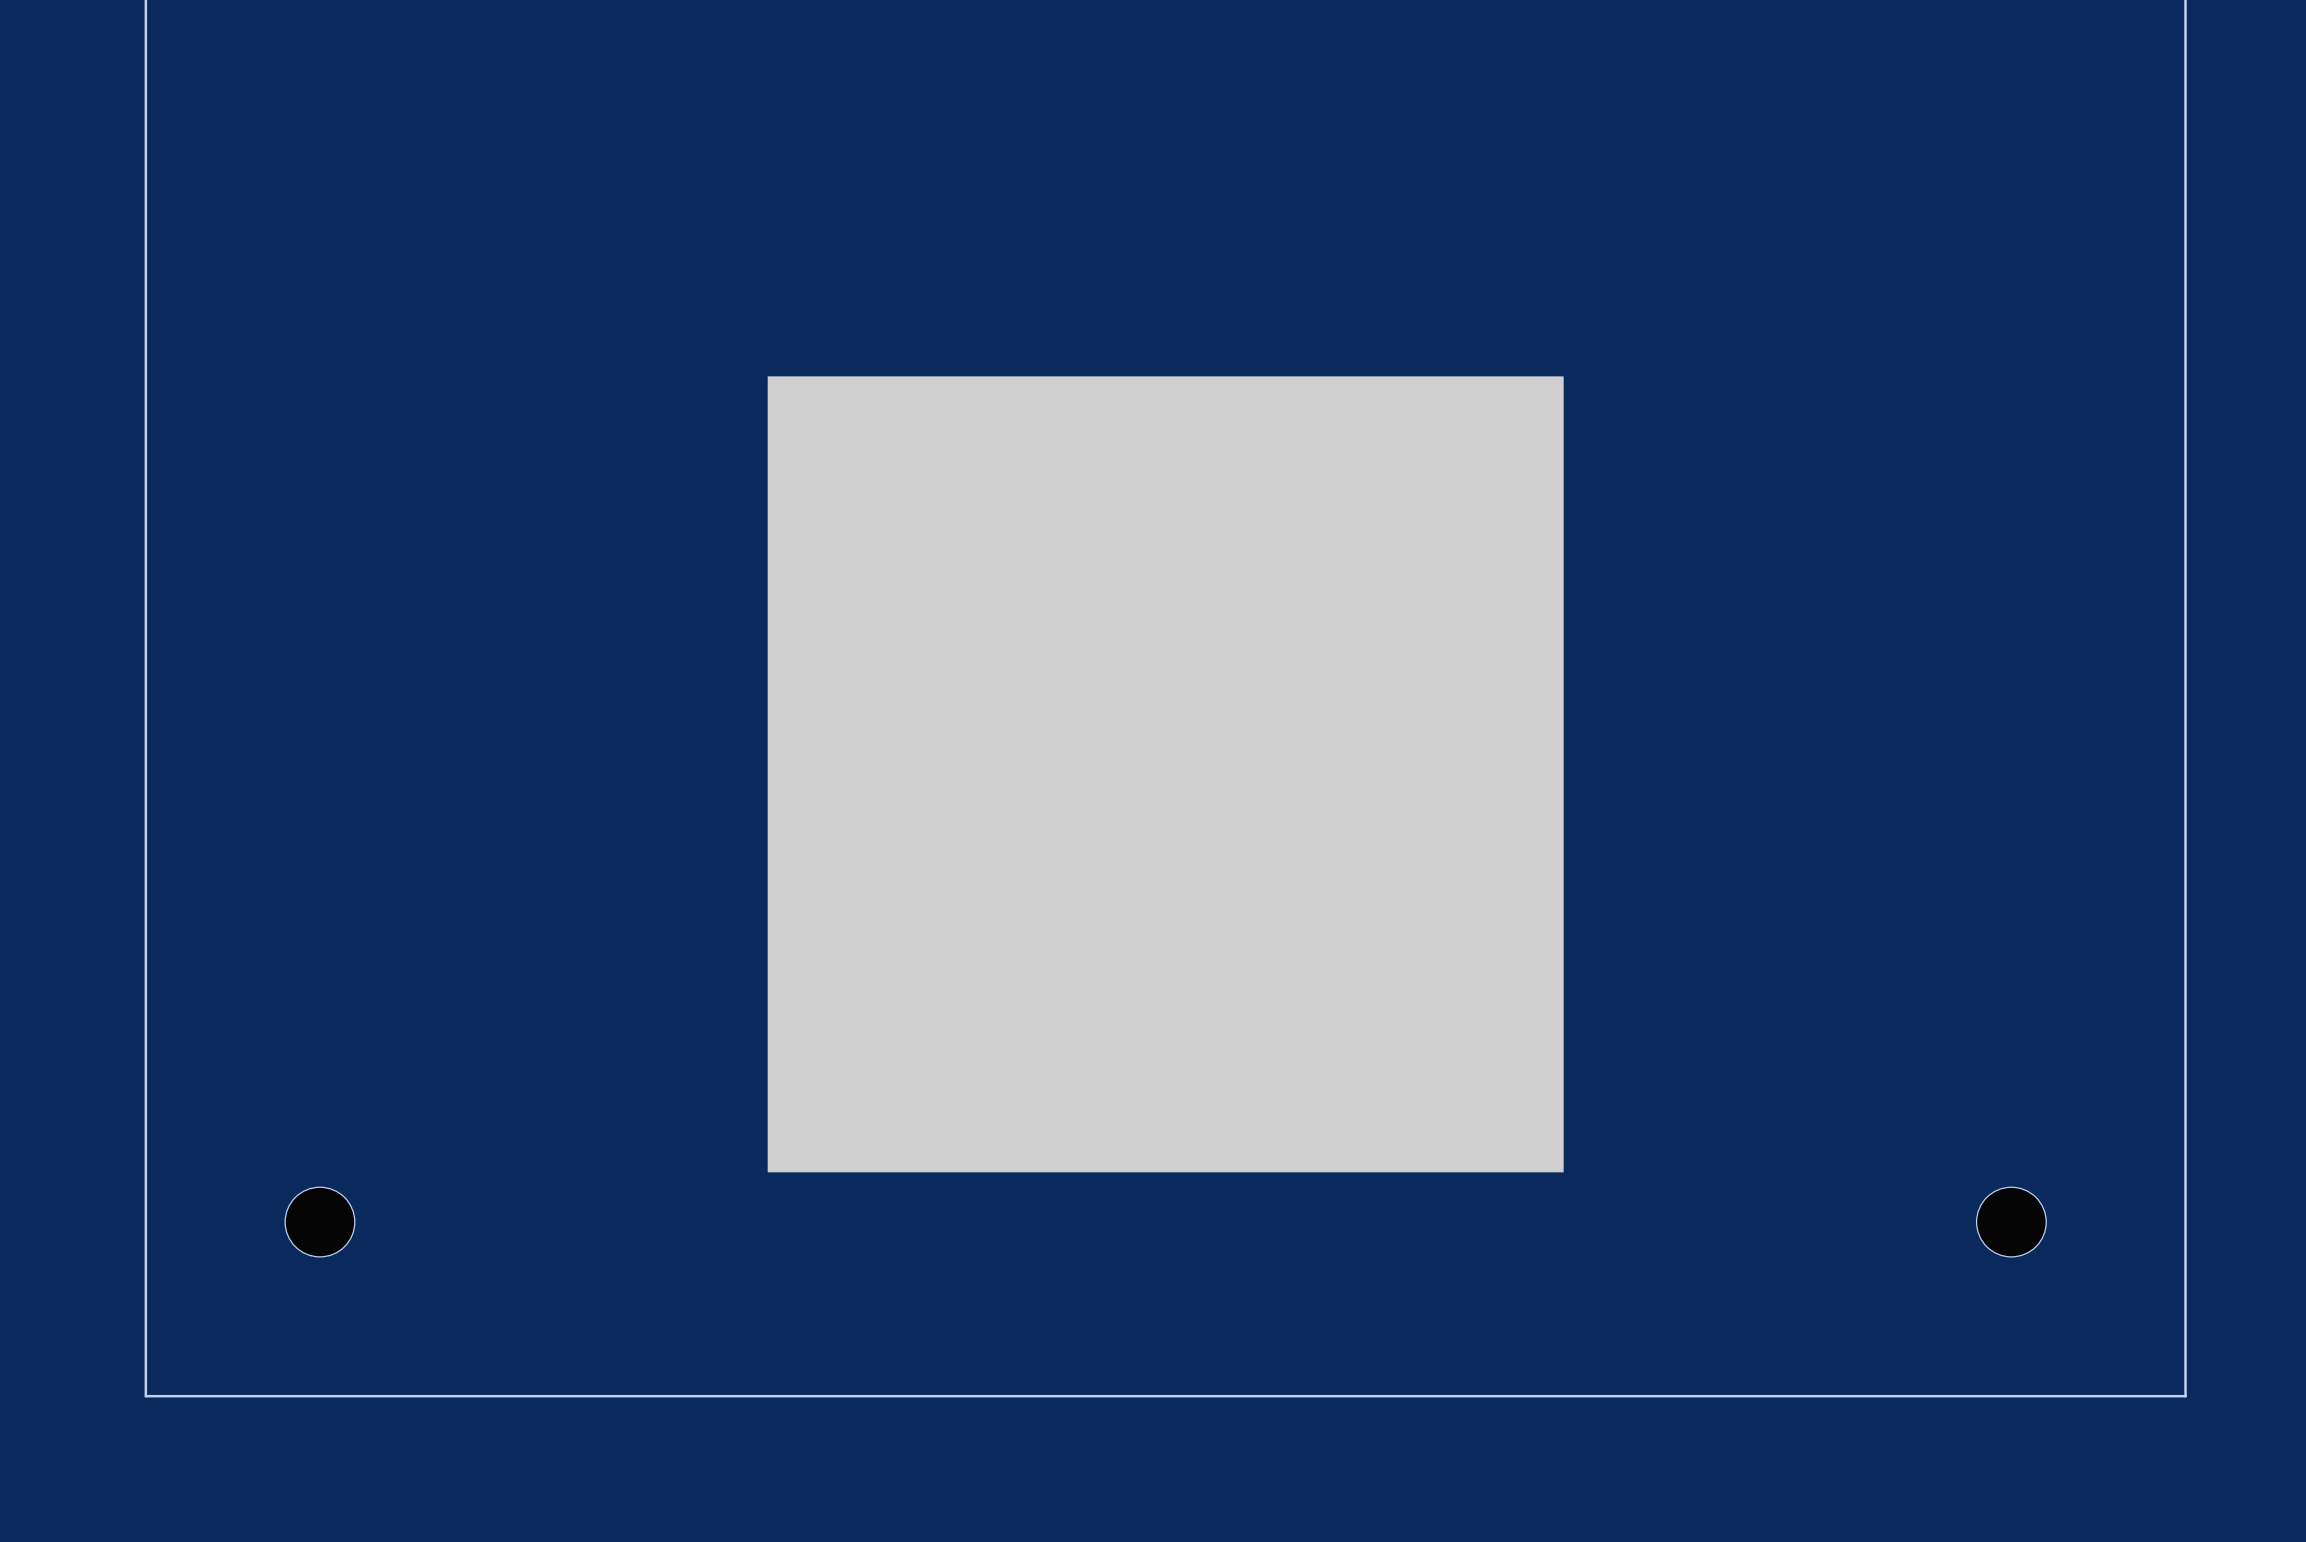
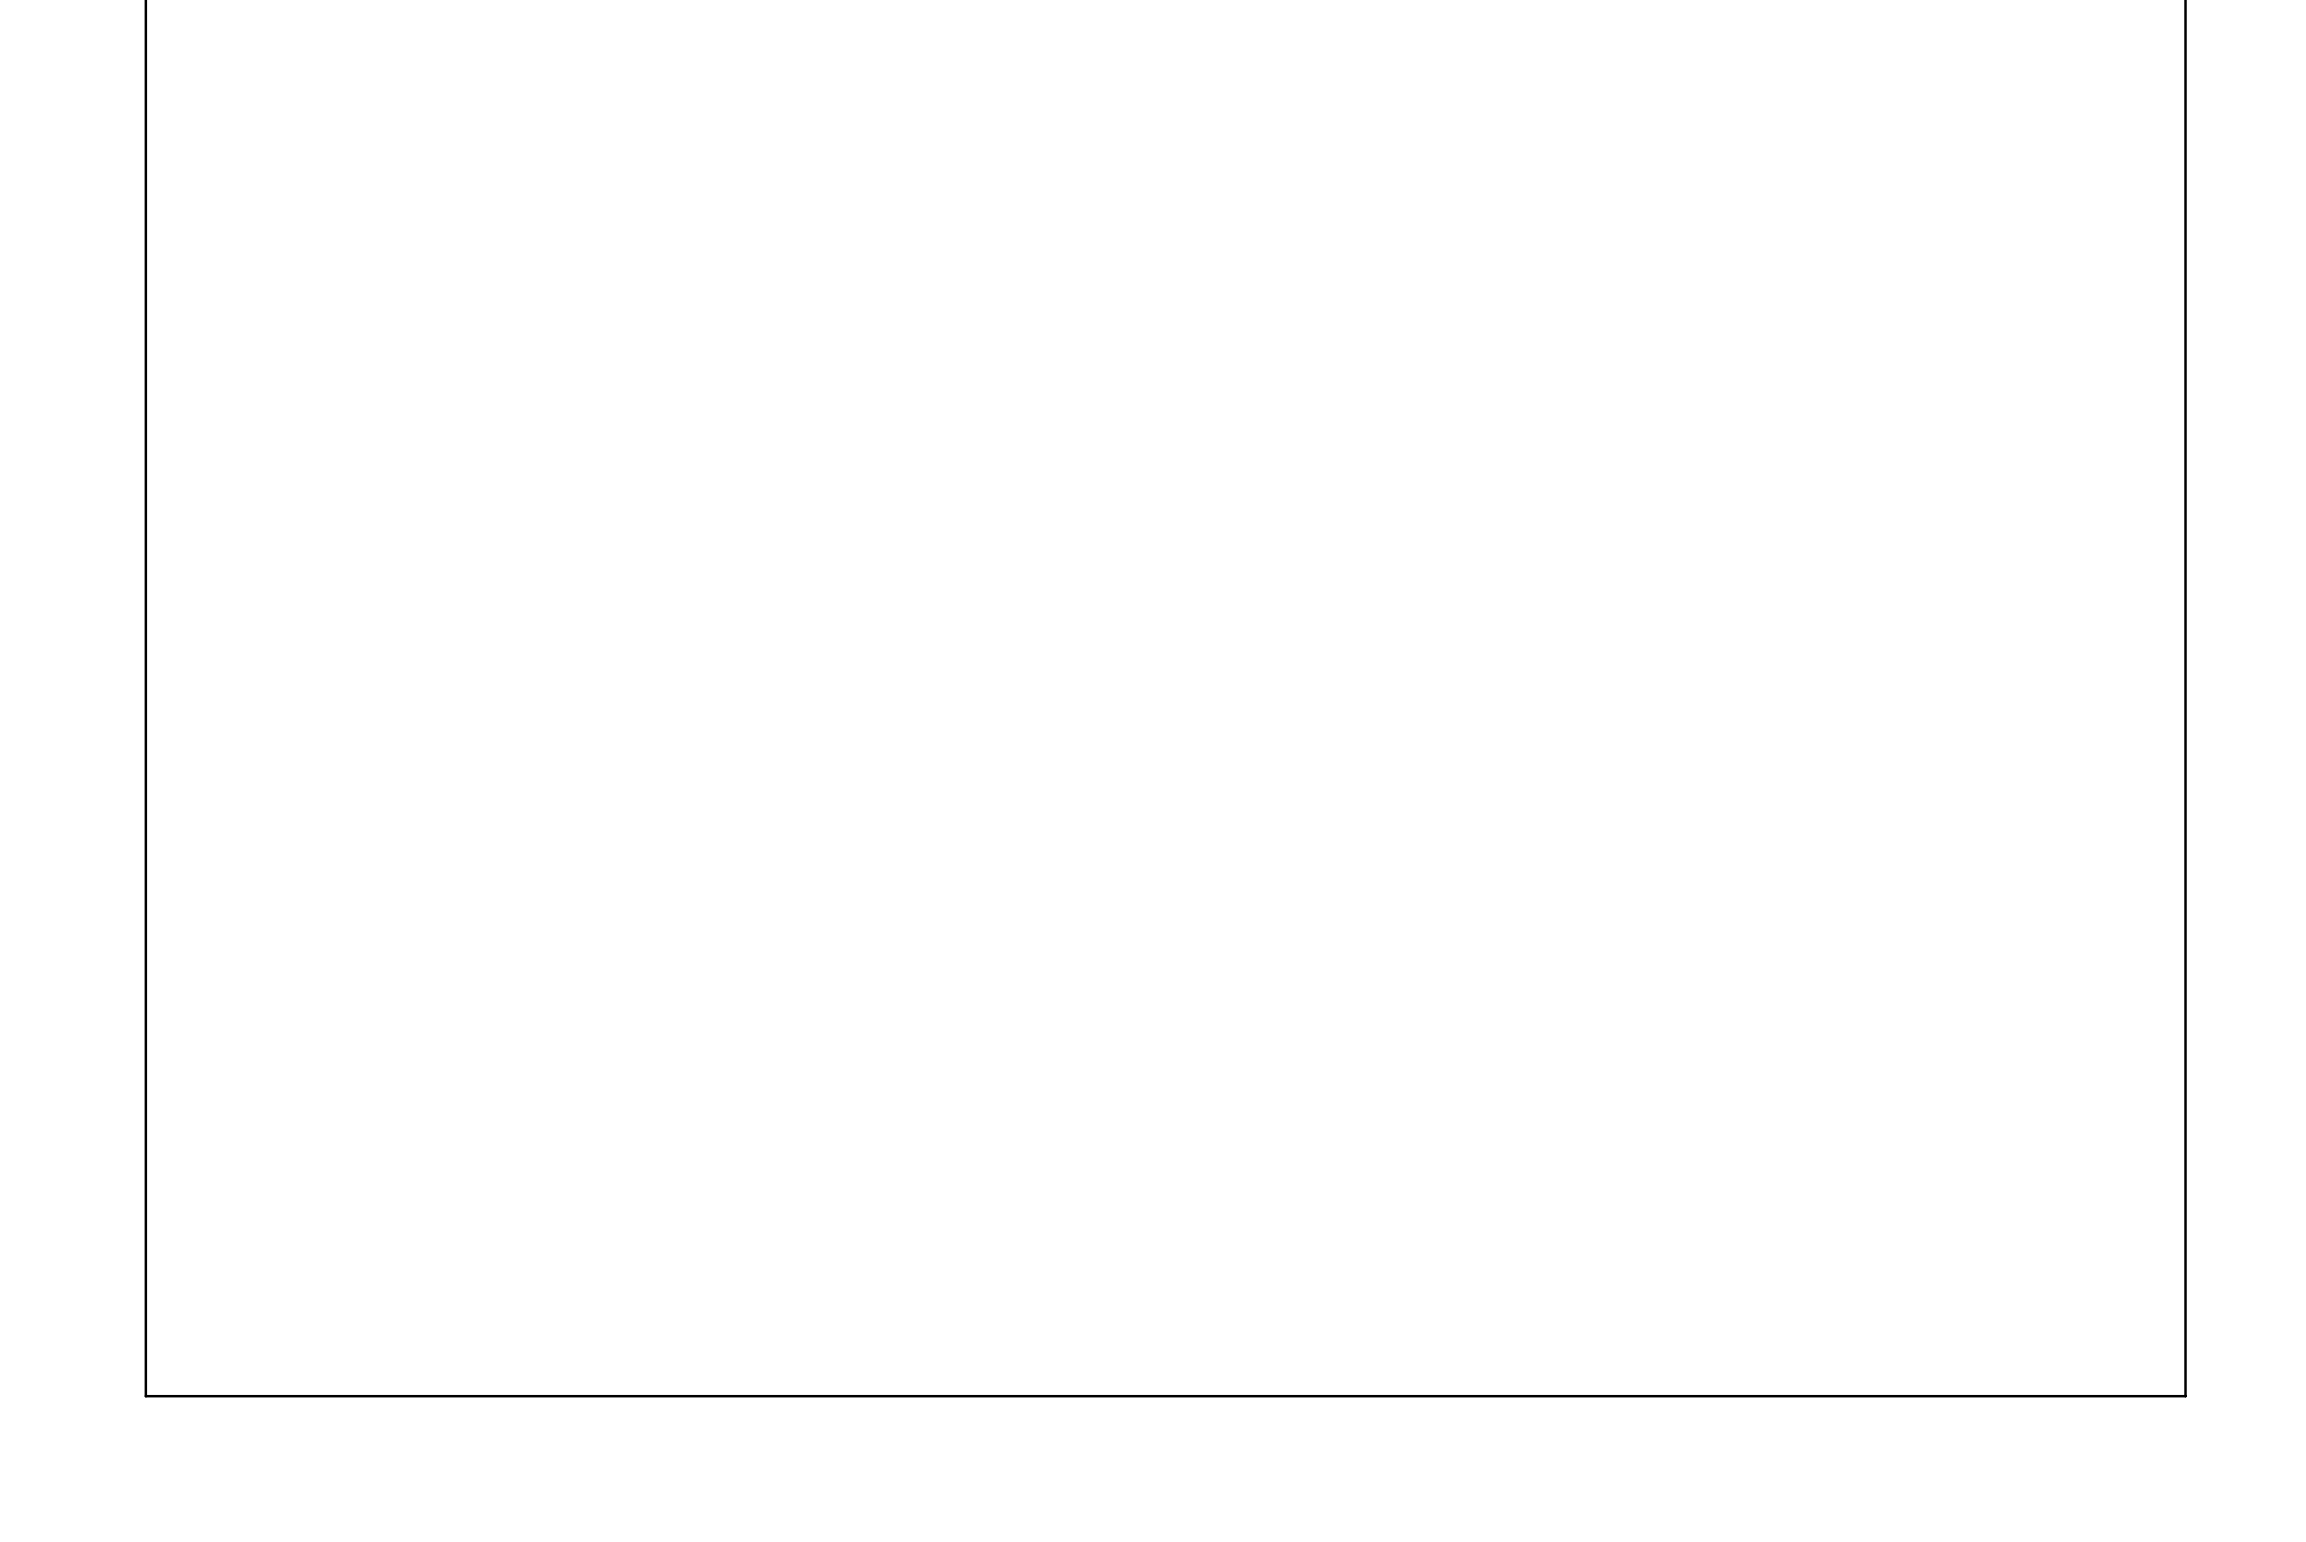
part: (1165, 774) -> none
part: (319, 1222) -> none
part: (2011, 1222) -> none

